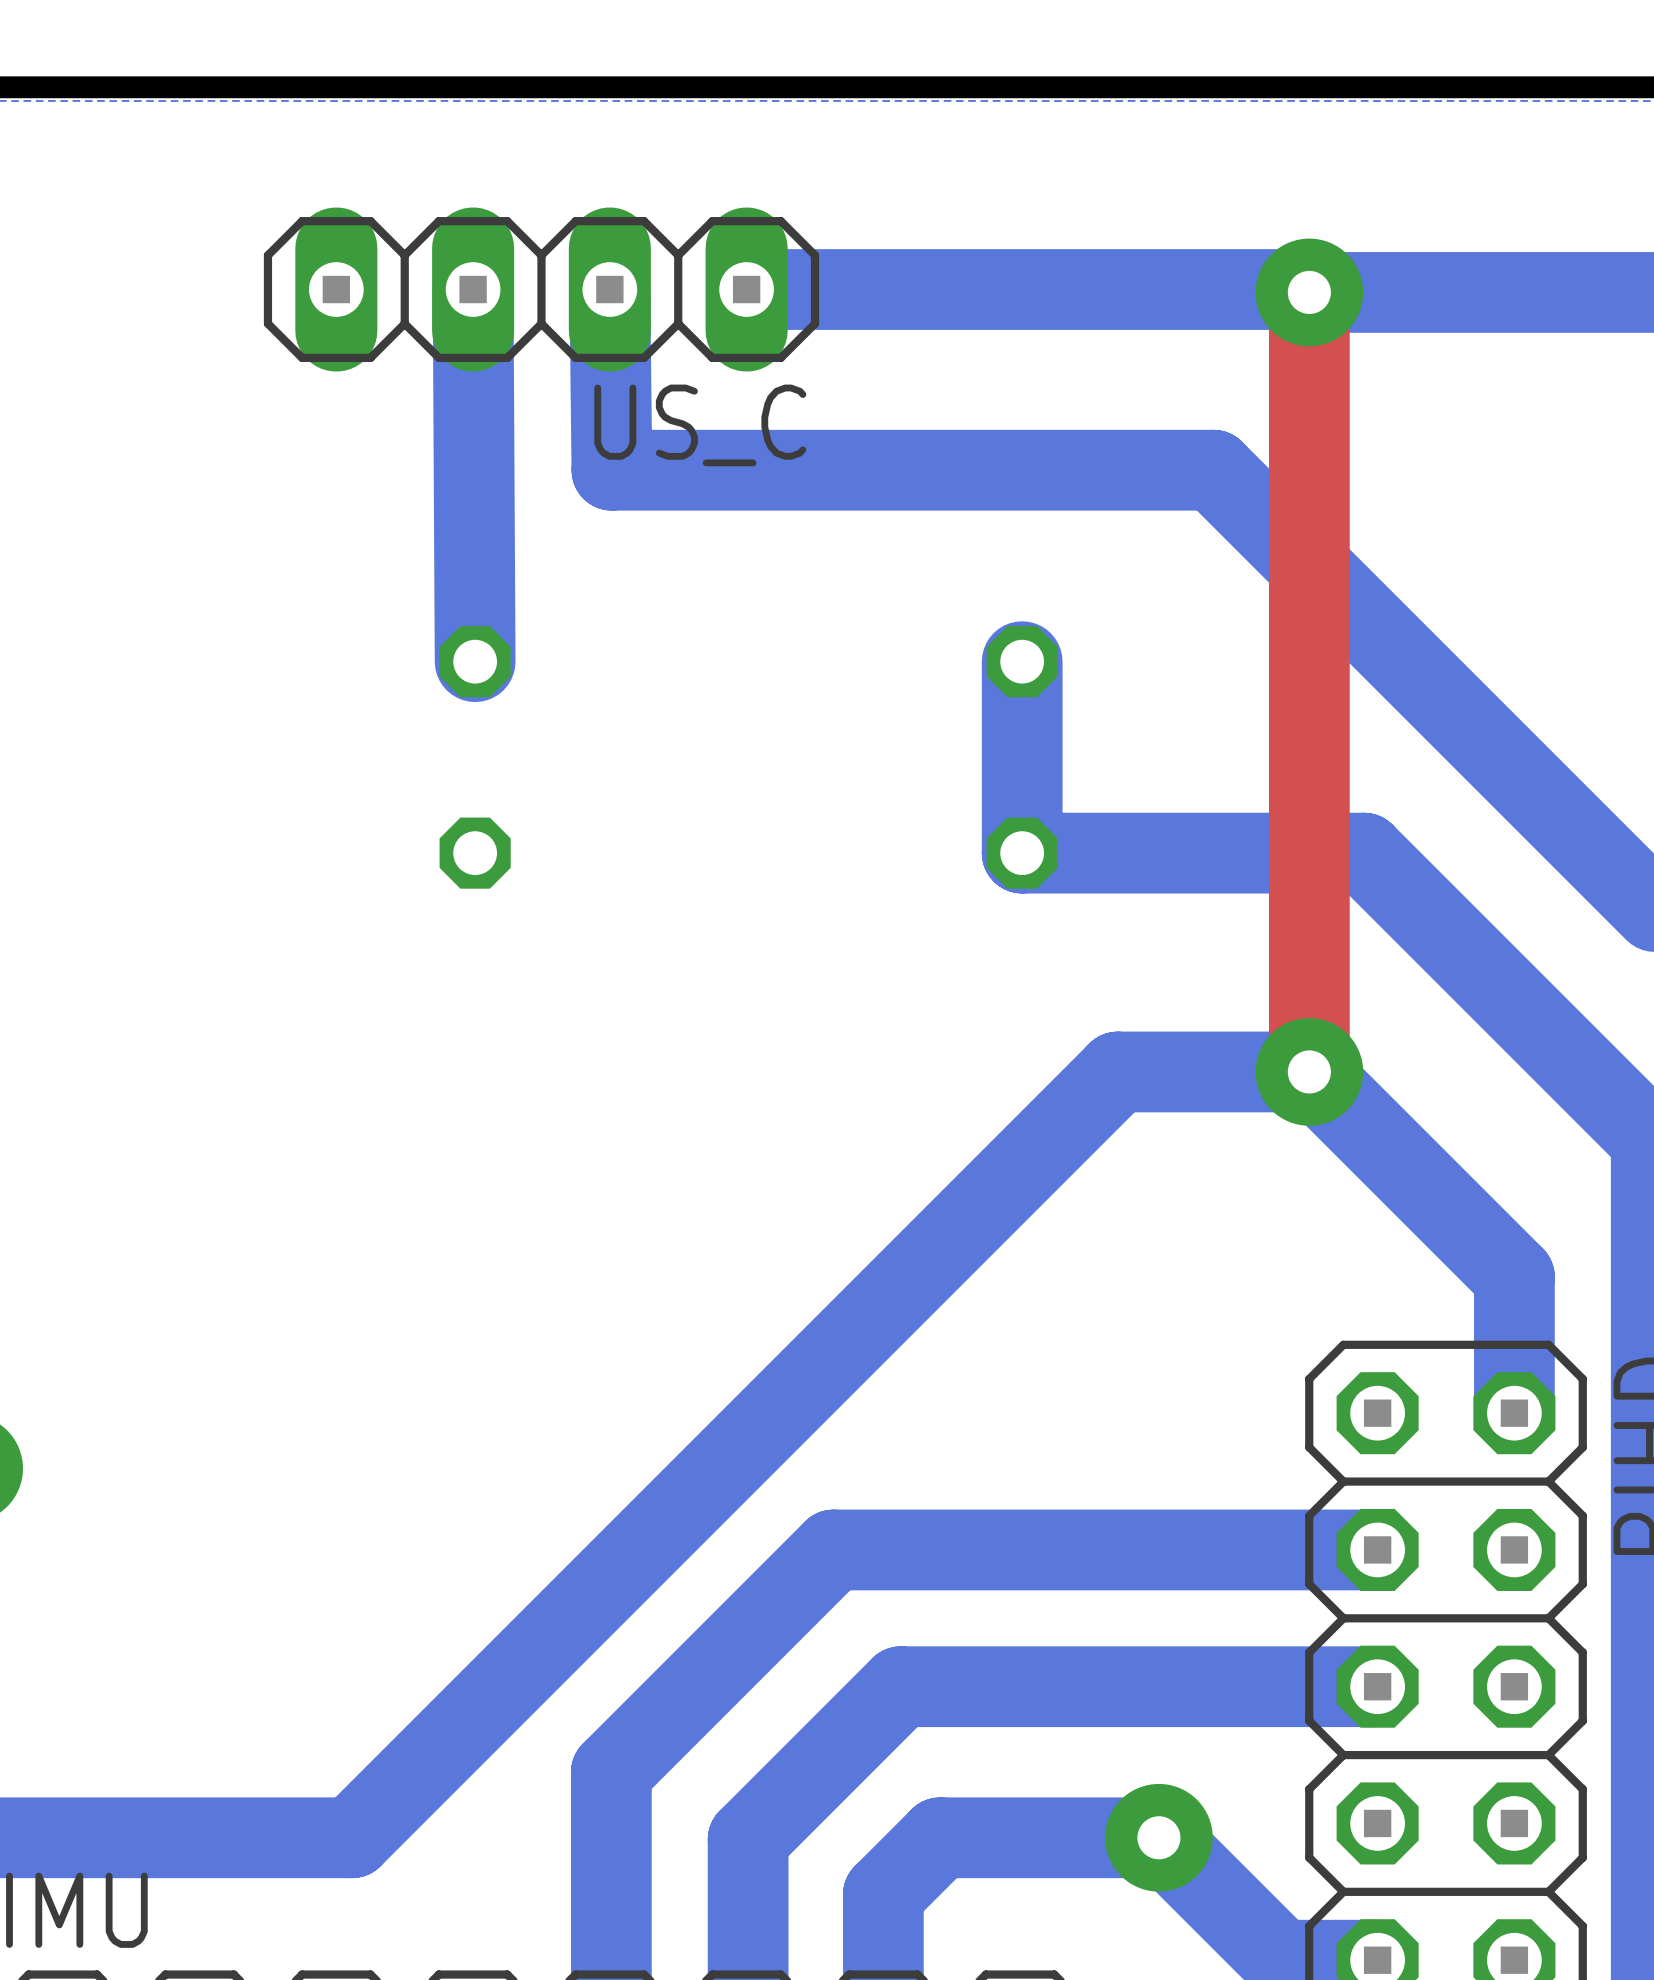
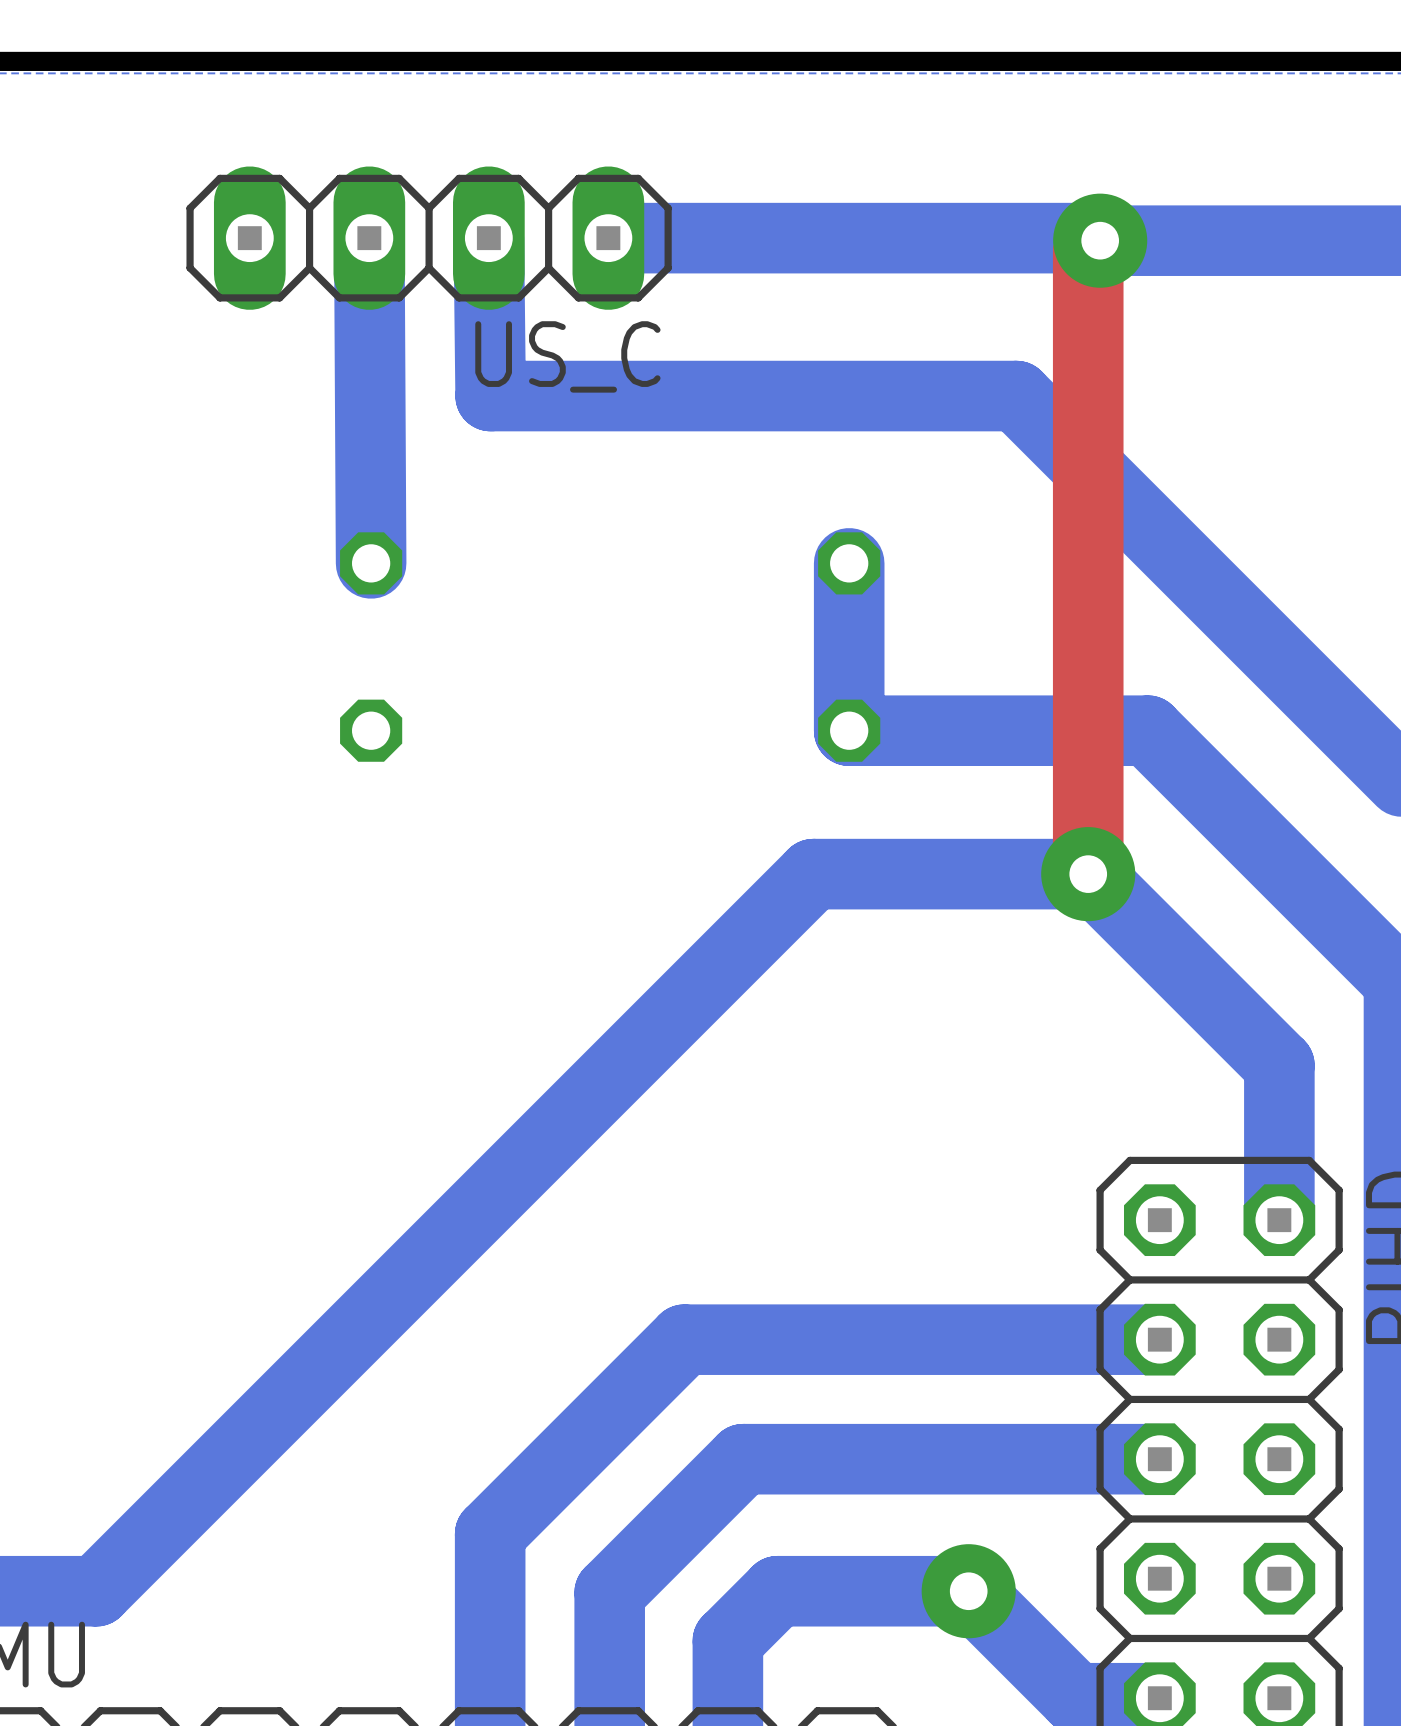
top track: (1309, 292) (1309, 1071) -> (1100, 240) (1088, 252) (1088, 874)
via position: (1309, 1071) -> (1088, 874)
bottom track: (1514, 1276) (1309, 1071) (1117, 1071) (352, 1837) (160, 1837) -> (1279, 1101) (1279, 1065) (1088, 874) (813, 874) (96, 1591)

